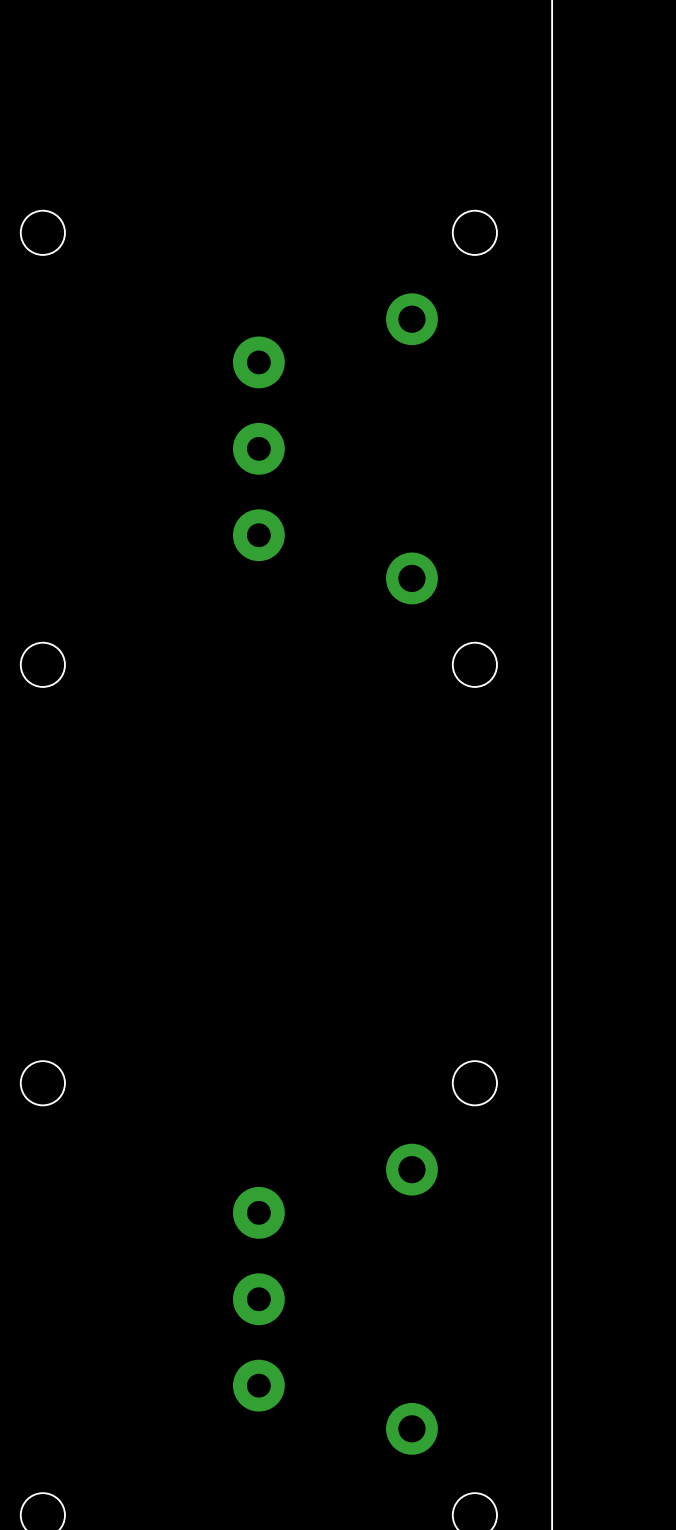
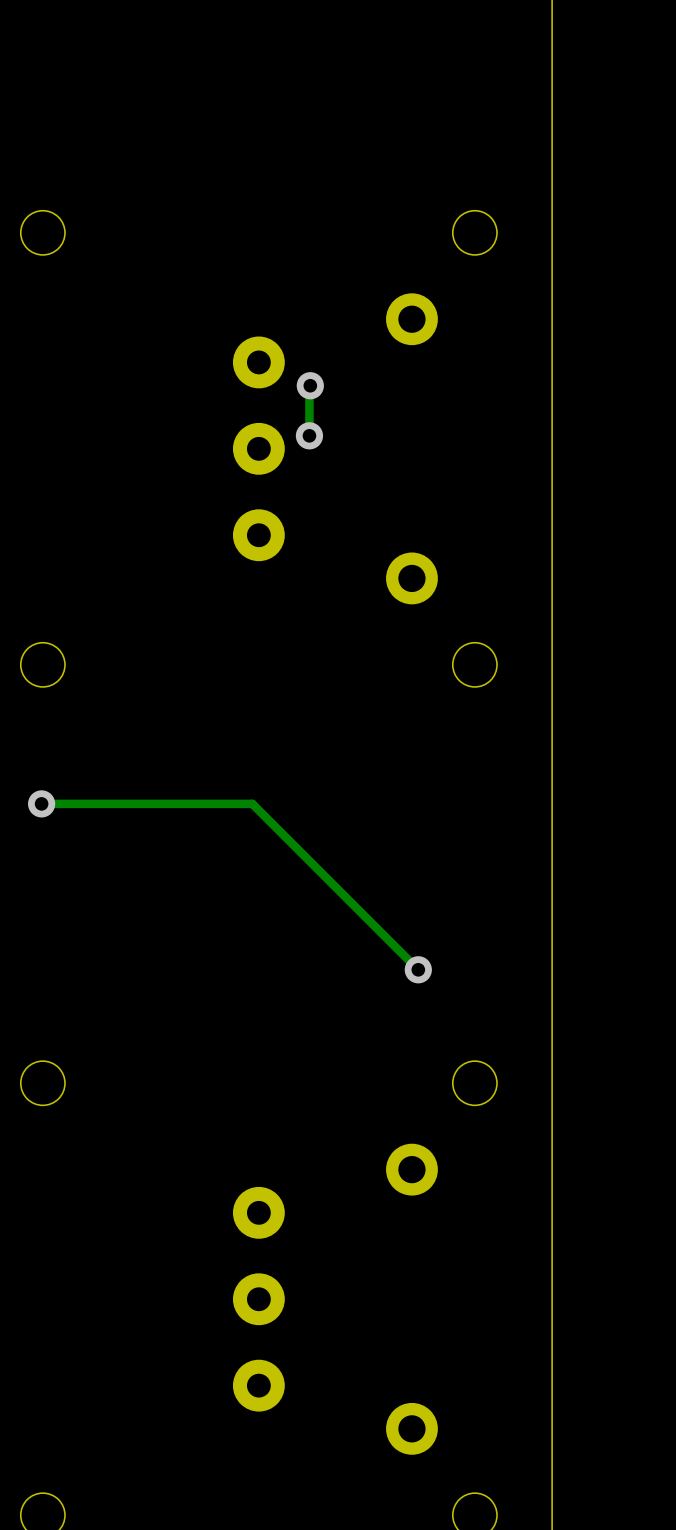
track: none -> (310, 385) (309, 435)
via: none -> (310, 385)
via: none -> (309, 435)
track: none -> (41, 803) (252, 803) (418, 969)
via: none -> (41, 803)
via: none -> (418, 969)

